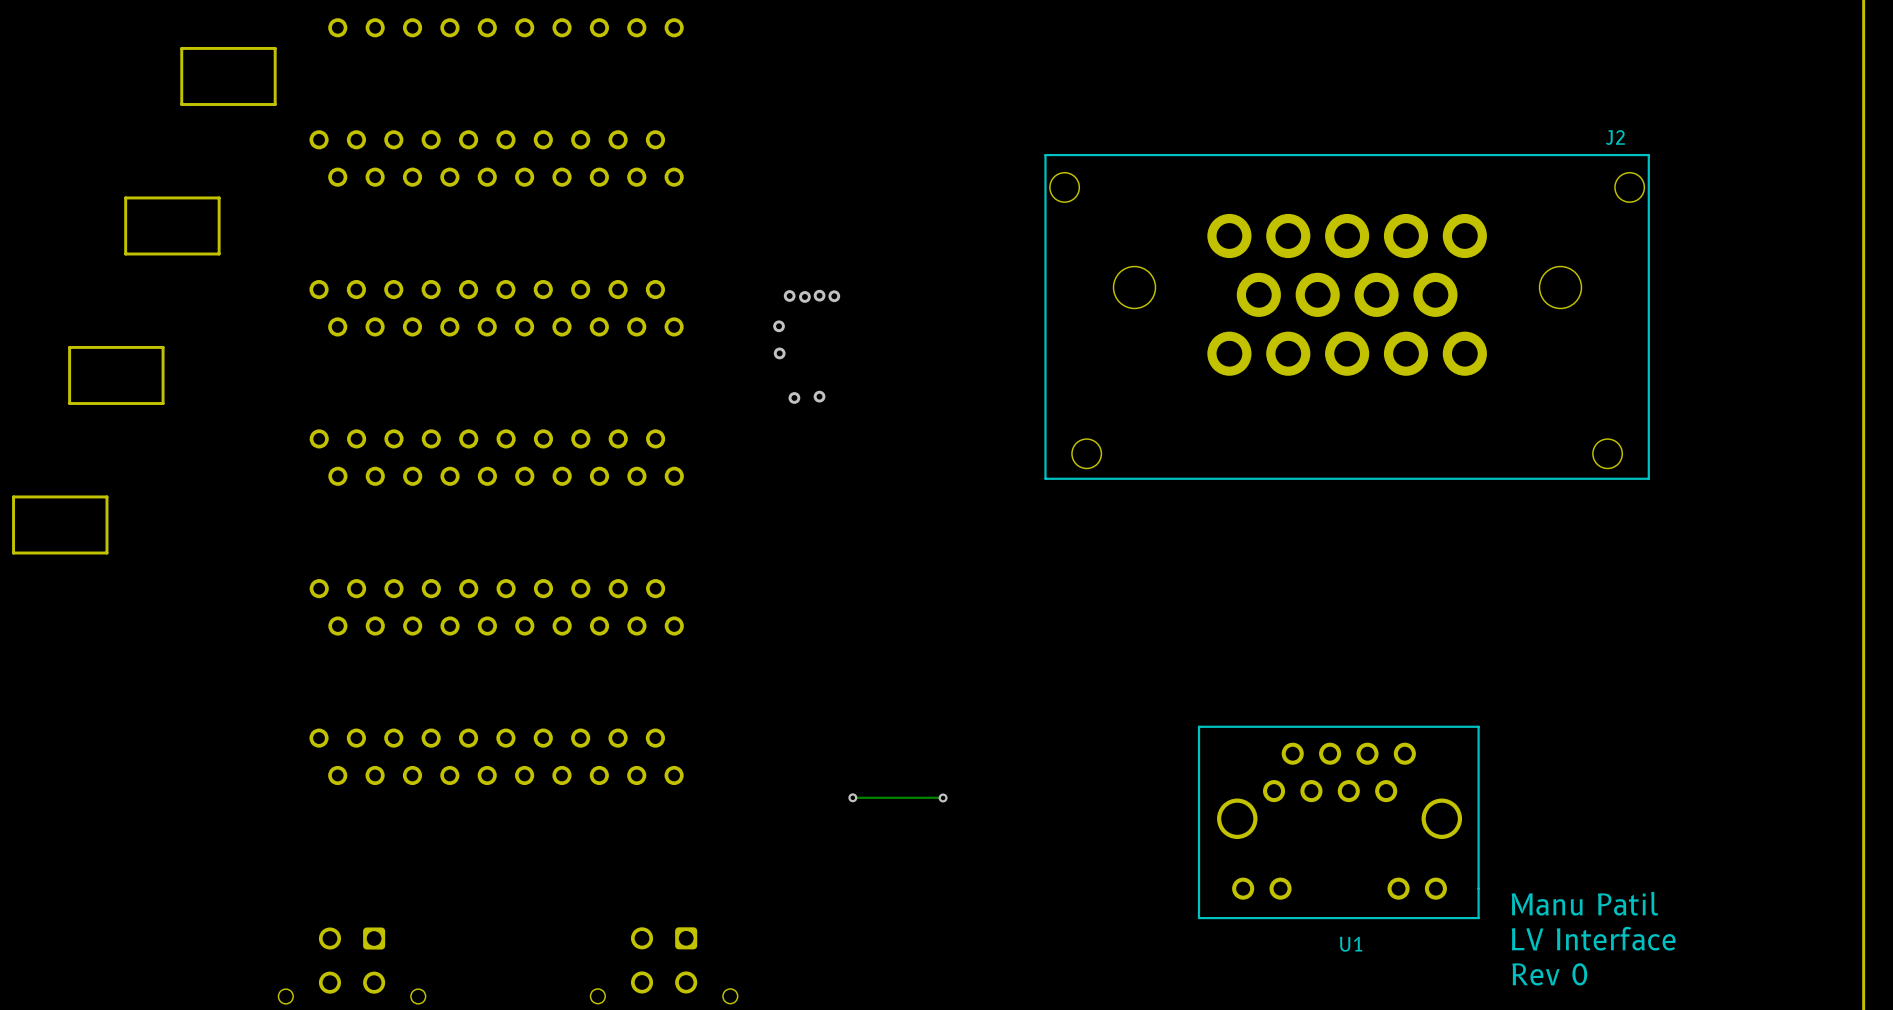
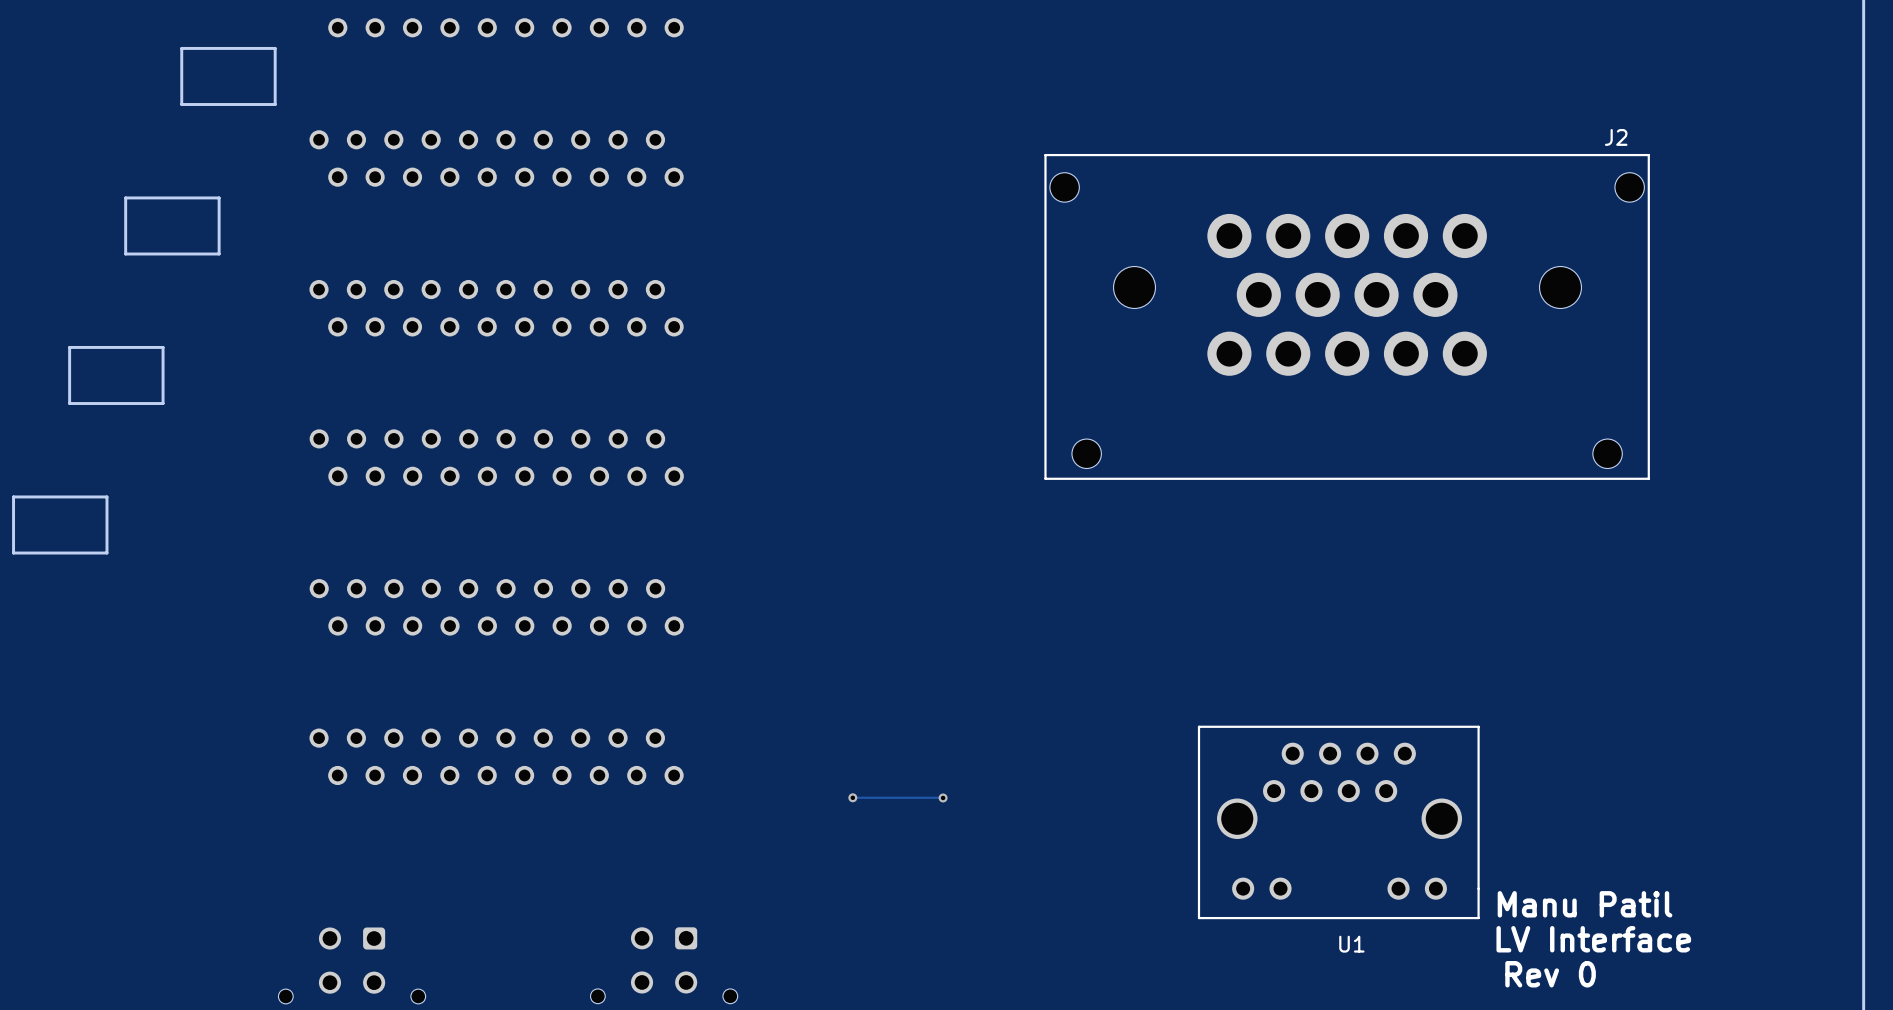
via: (789, 295) -> none
via: (819, 295) -> none
via: (804, 296) -> none
via: (834, 296) -> none
via: (779, 326) -> none
via: (779, 353) -> none
via: (819, 396) -> none
via: (794, 397) -> none

